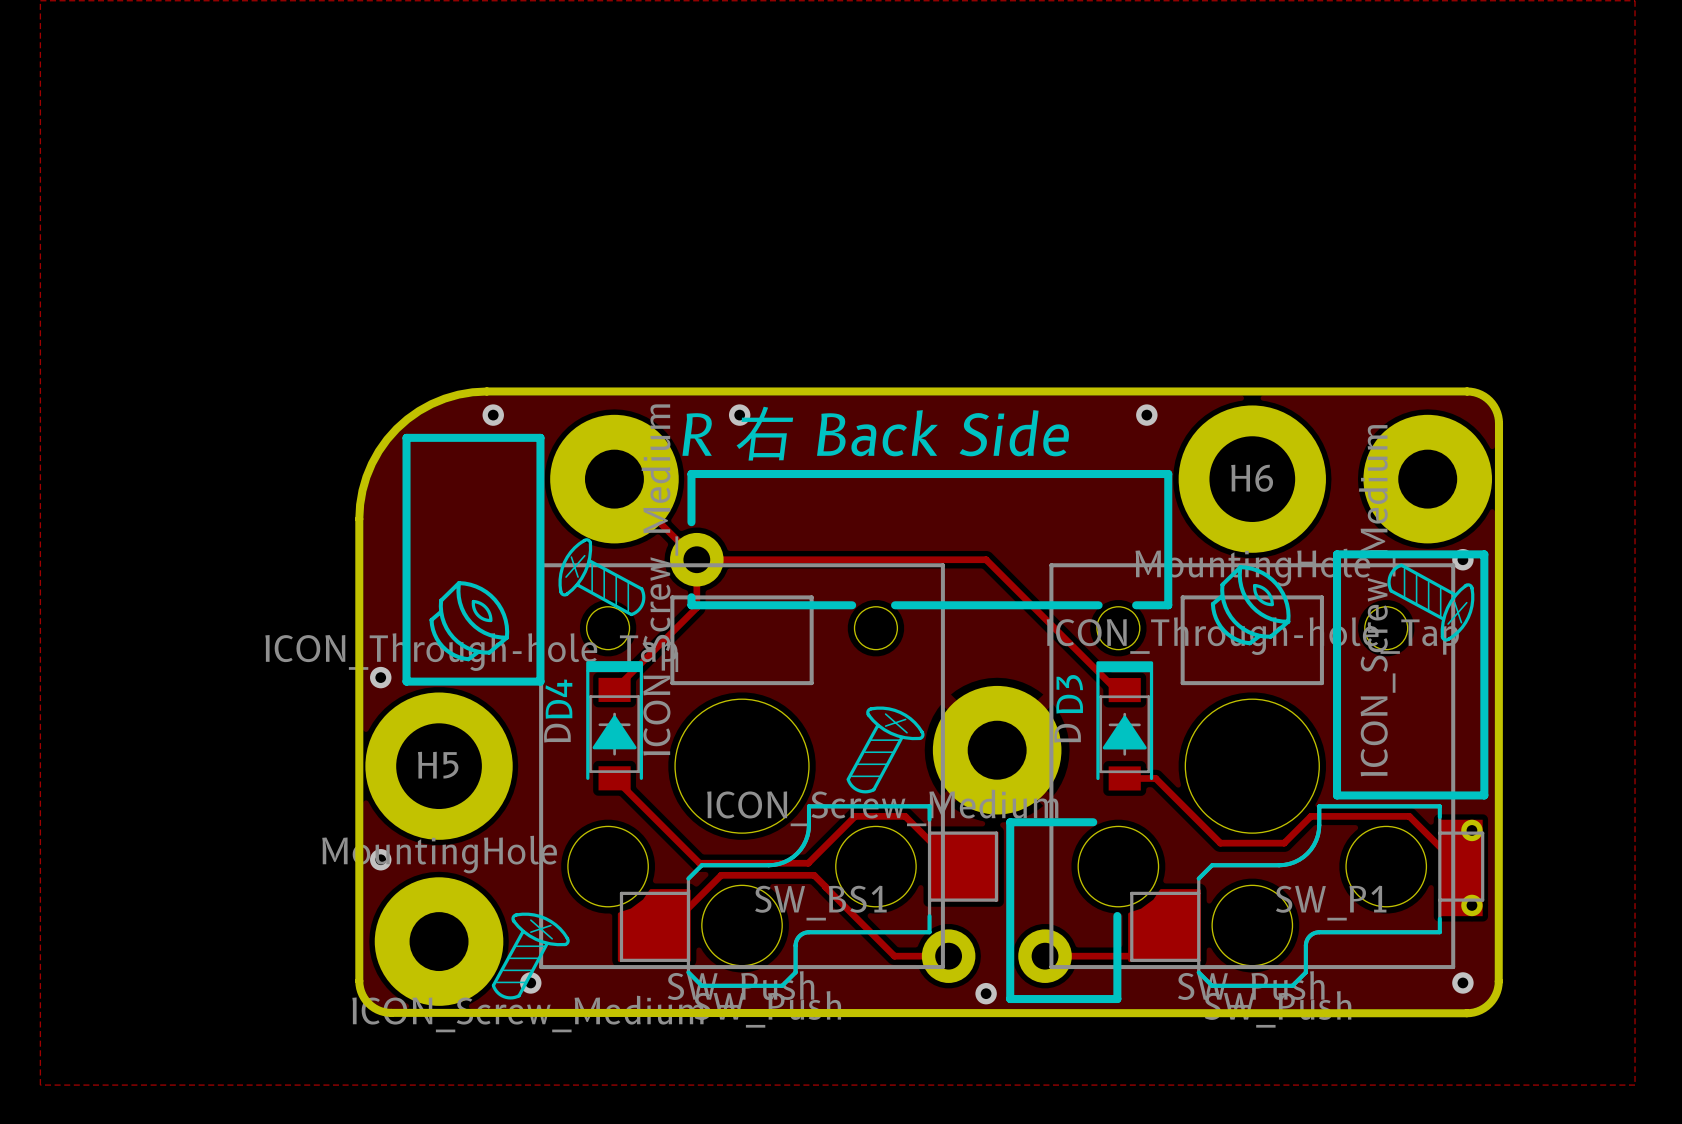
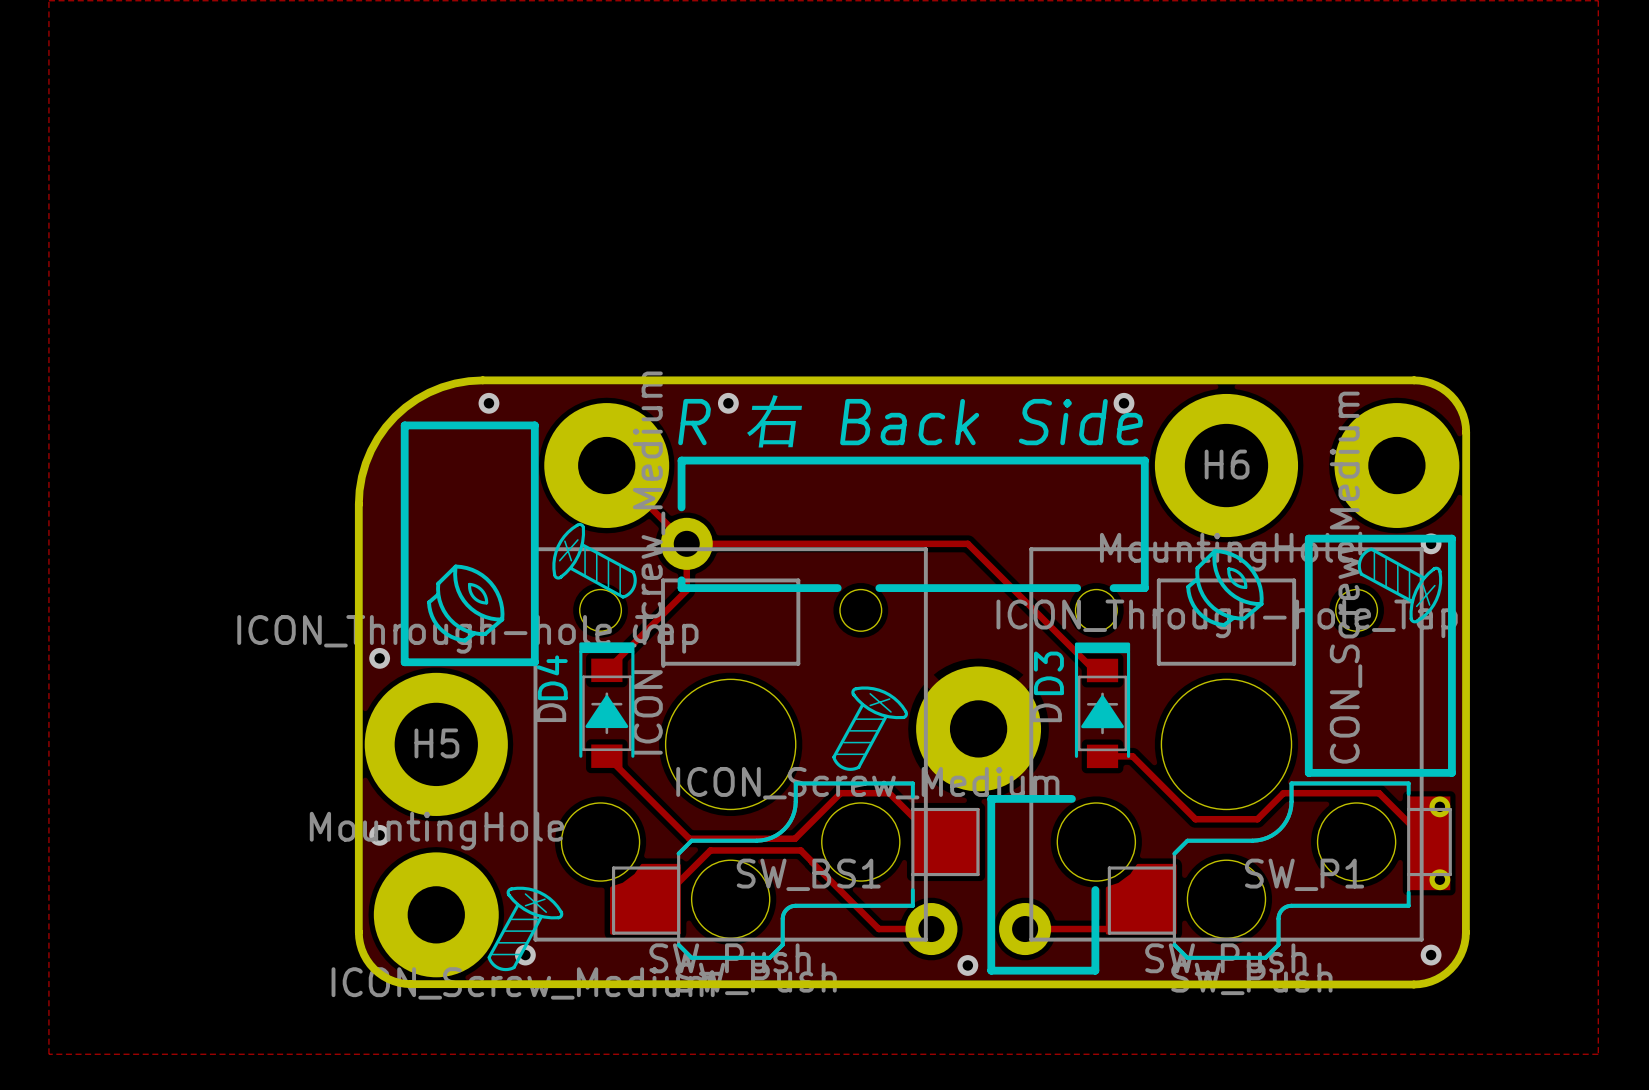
drawing shape: [355, 387, 1504, 1018] -> [354, 376, 1471, 989]

